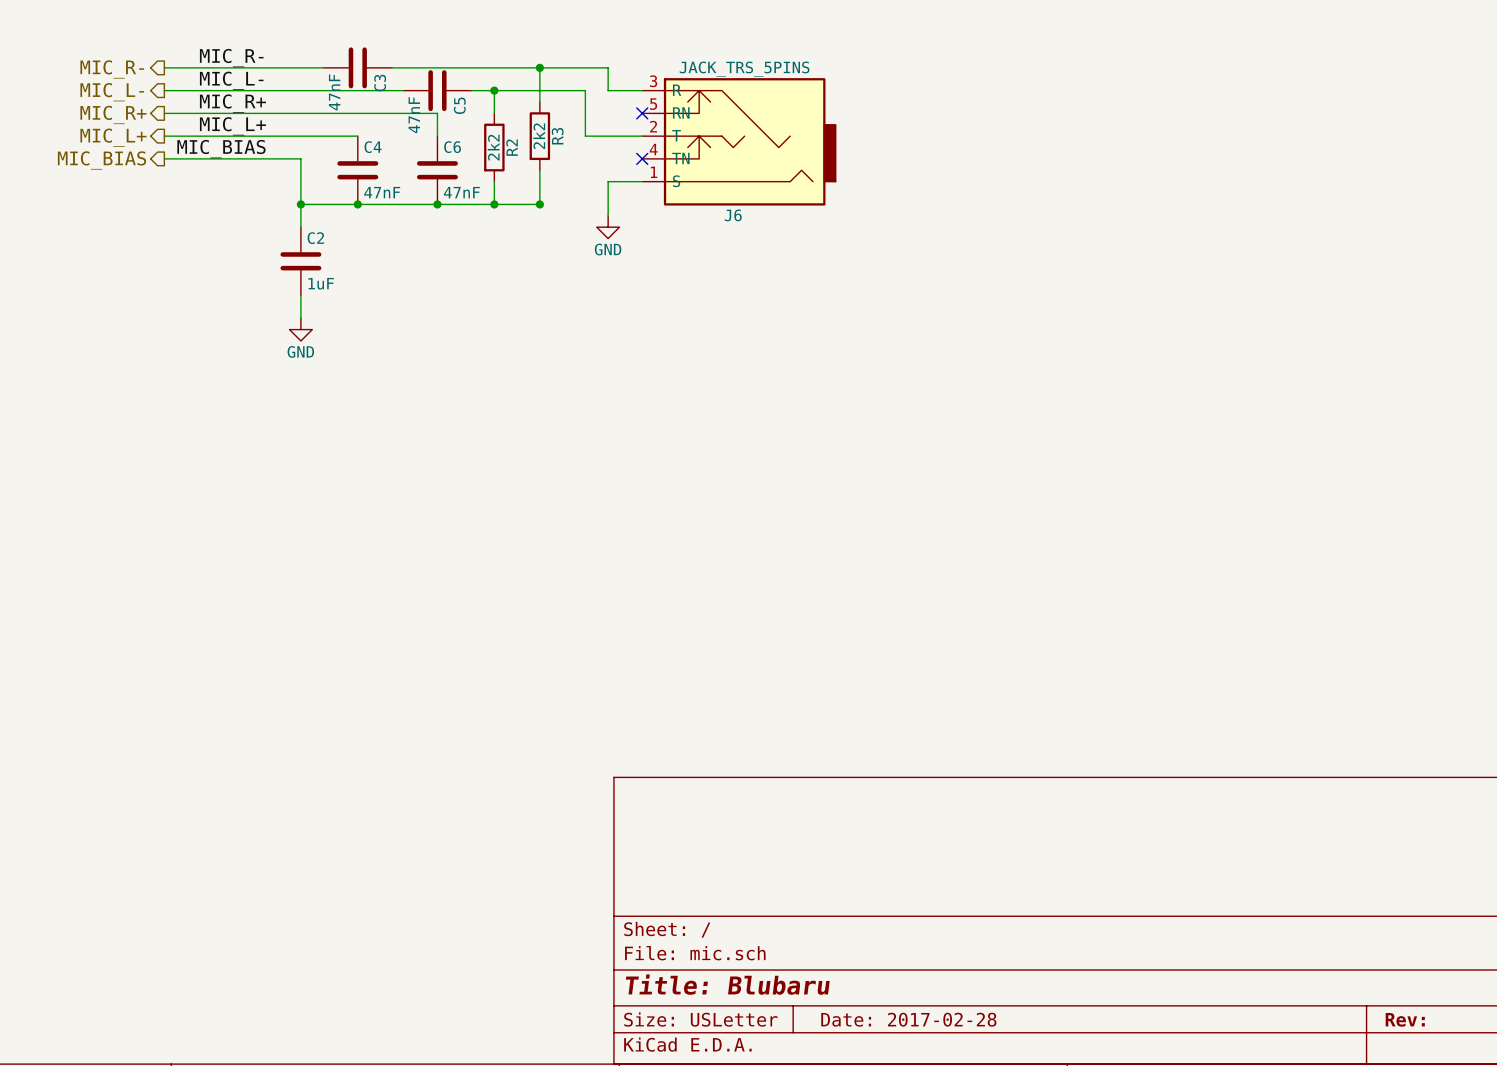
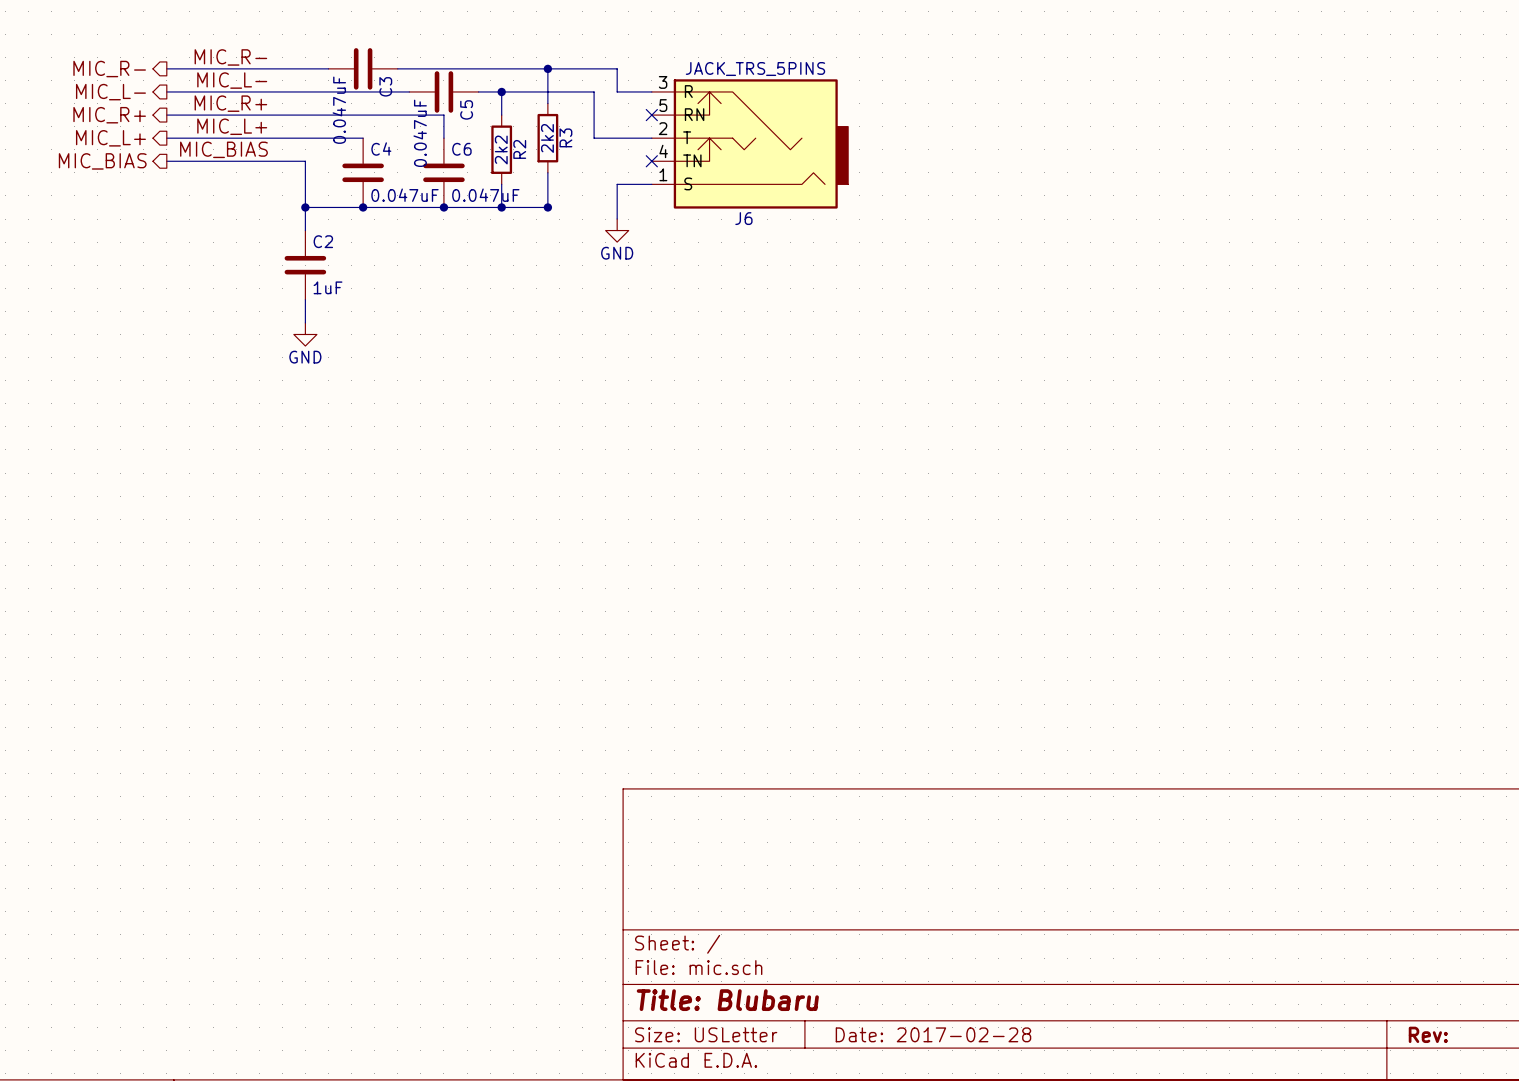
C3 value: 47nF (334, 92) -> 0.047uF (339, 110)
C5 value: 47nF (414, 115) -> 0.047uF (420, 133)
C4 value: 47nF (382, 192) -> 0.047uF (405, 195)
C6 value: 47nF (461, 192) -> 0.047uF (485, 195)

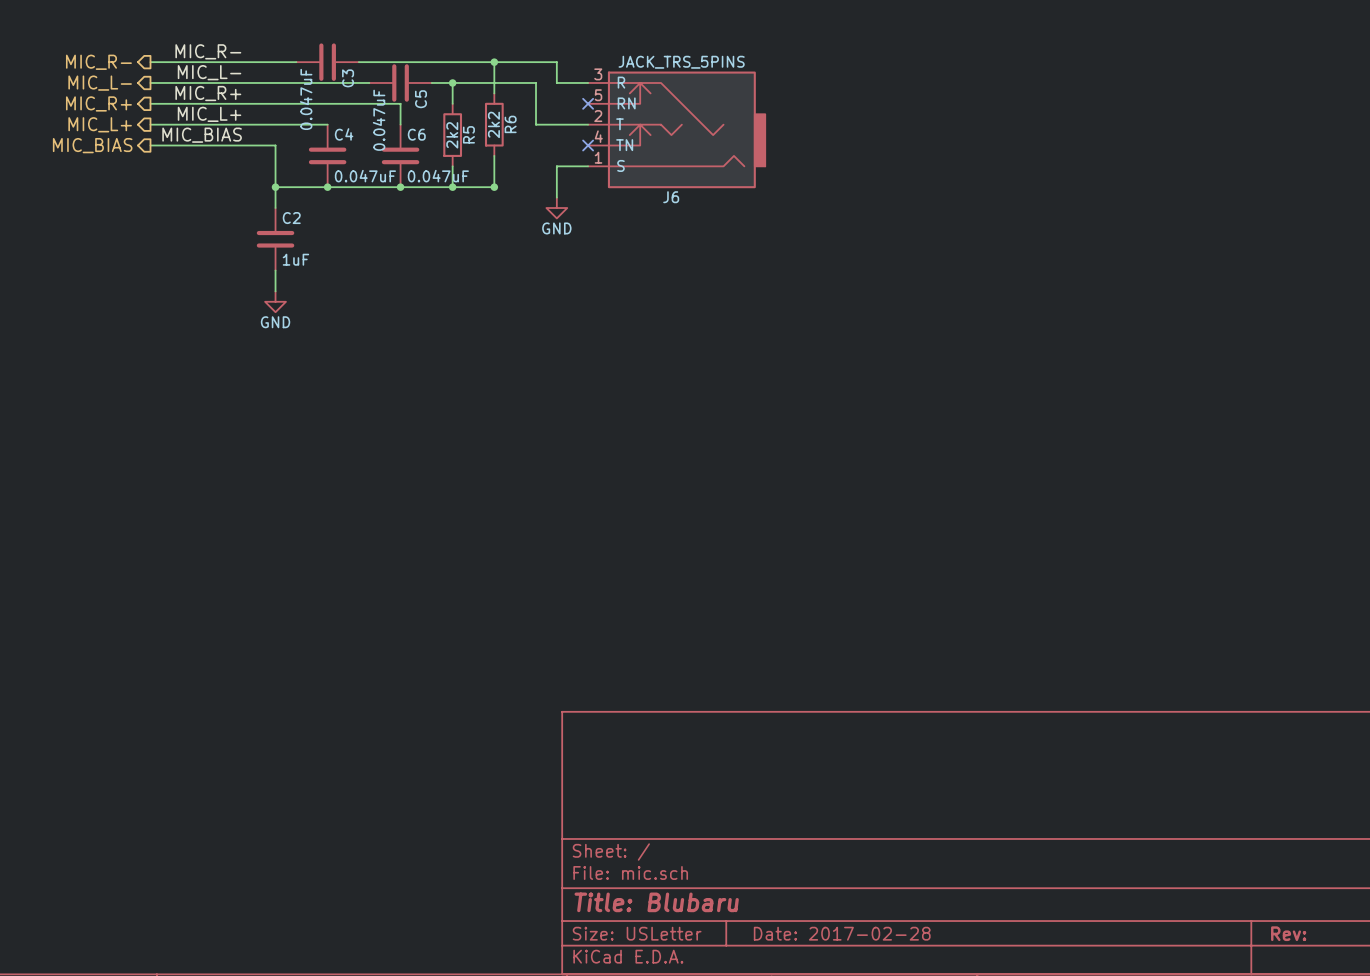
R3 name: R3 (565, 137) -> R6 (510, 124)
R2 name: R2 (519, 149) -> R5 (468, 134)

